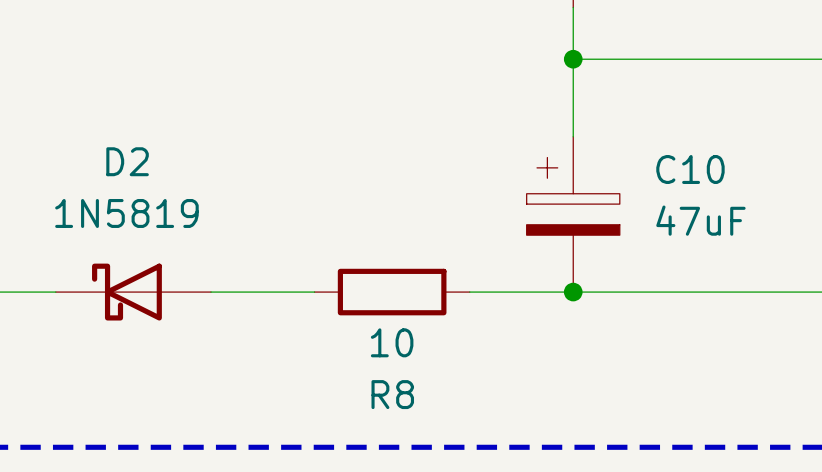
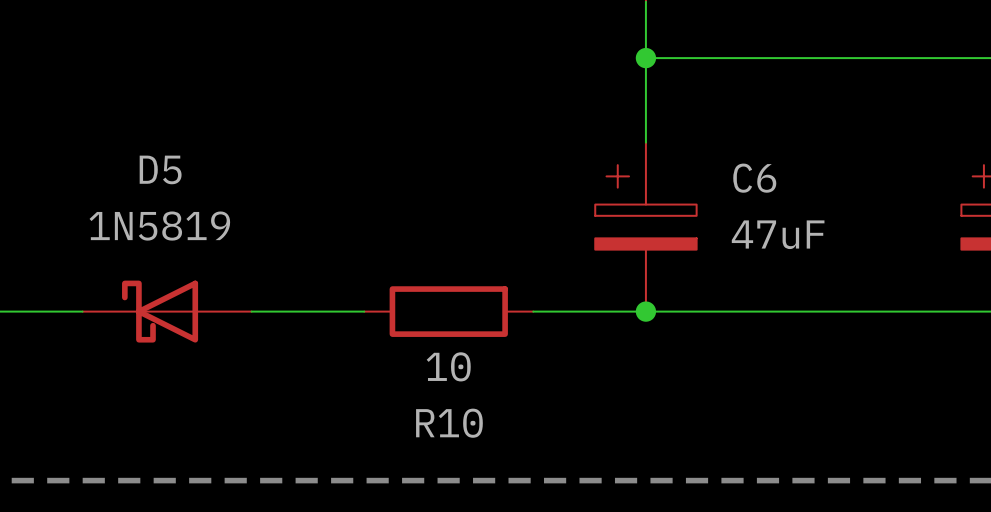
D2 name: D2 (127, 161) -> D5 (160, 169)
C10 name: C10 (690, 169) -> C6 (754, 178)
R8 name: R8 (392, 394) -> R10 (449, 423)

